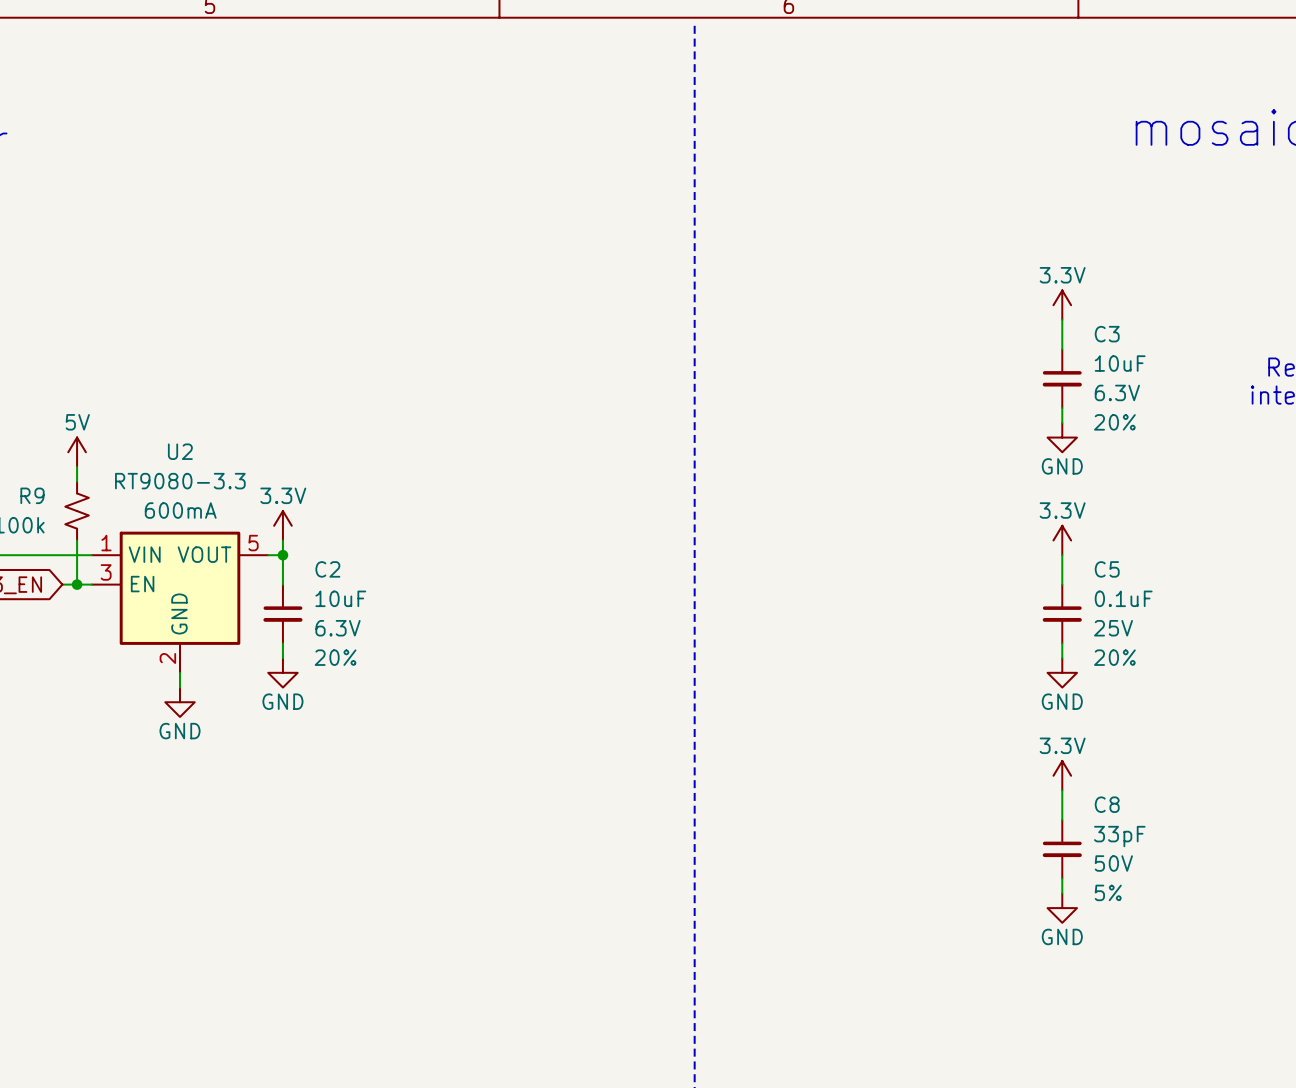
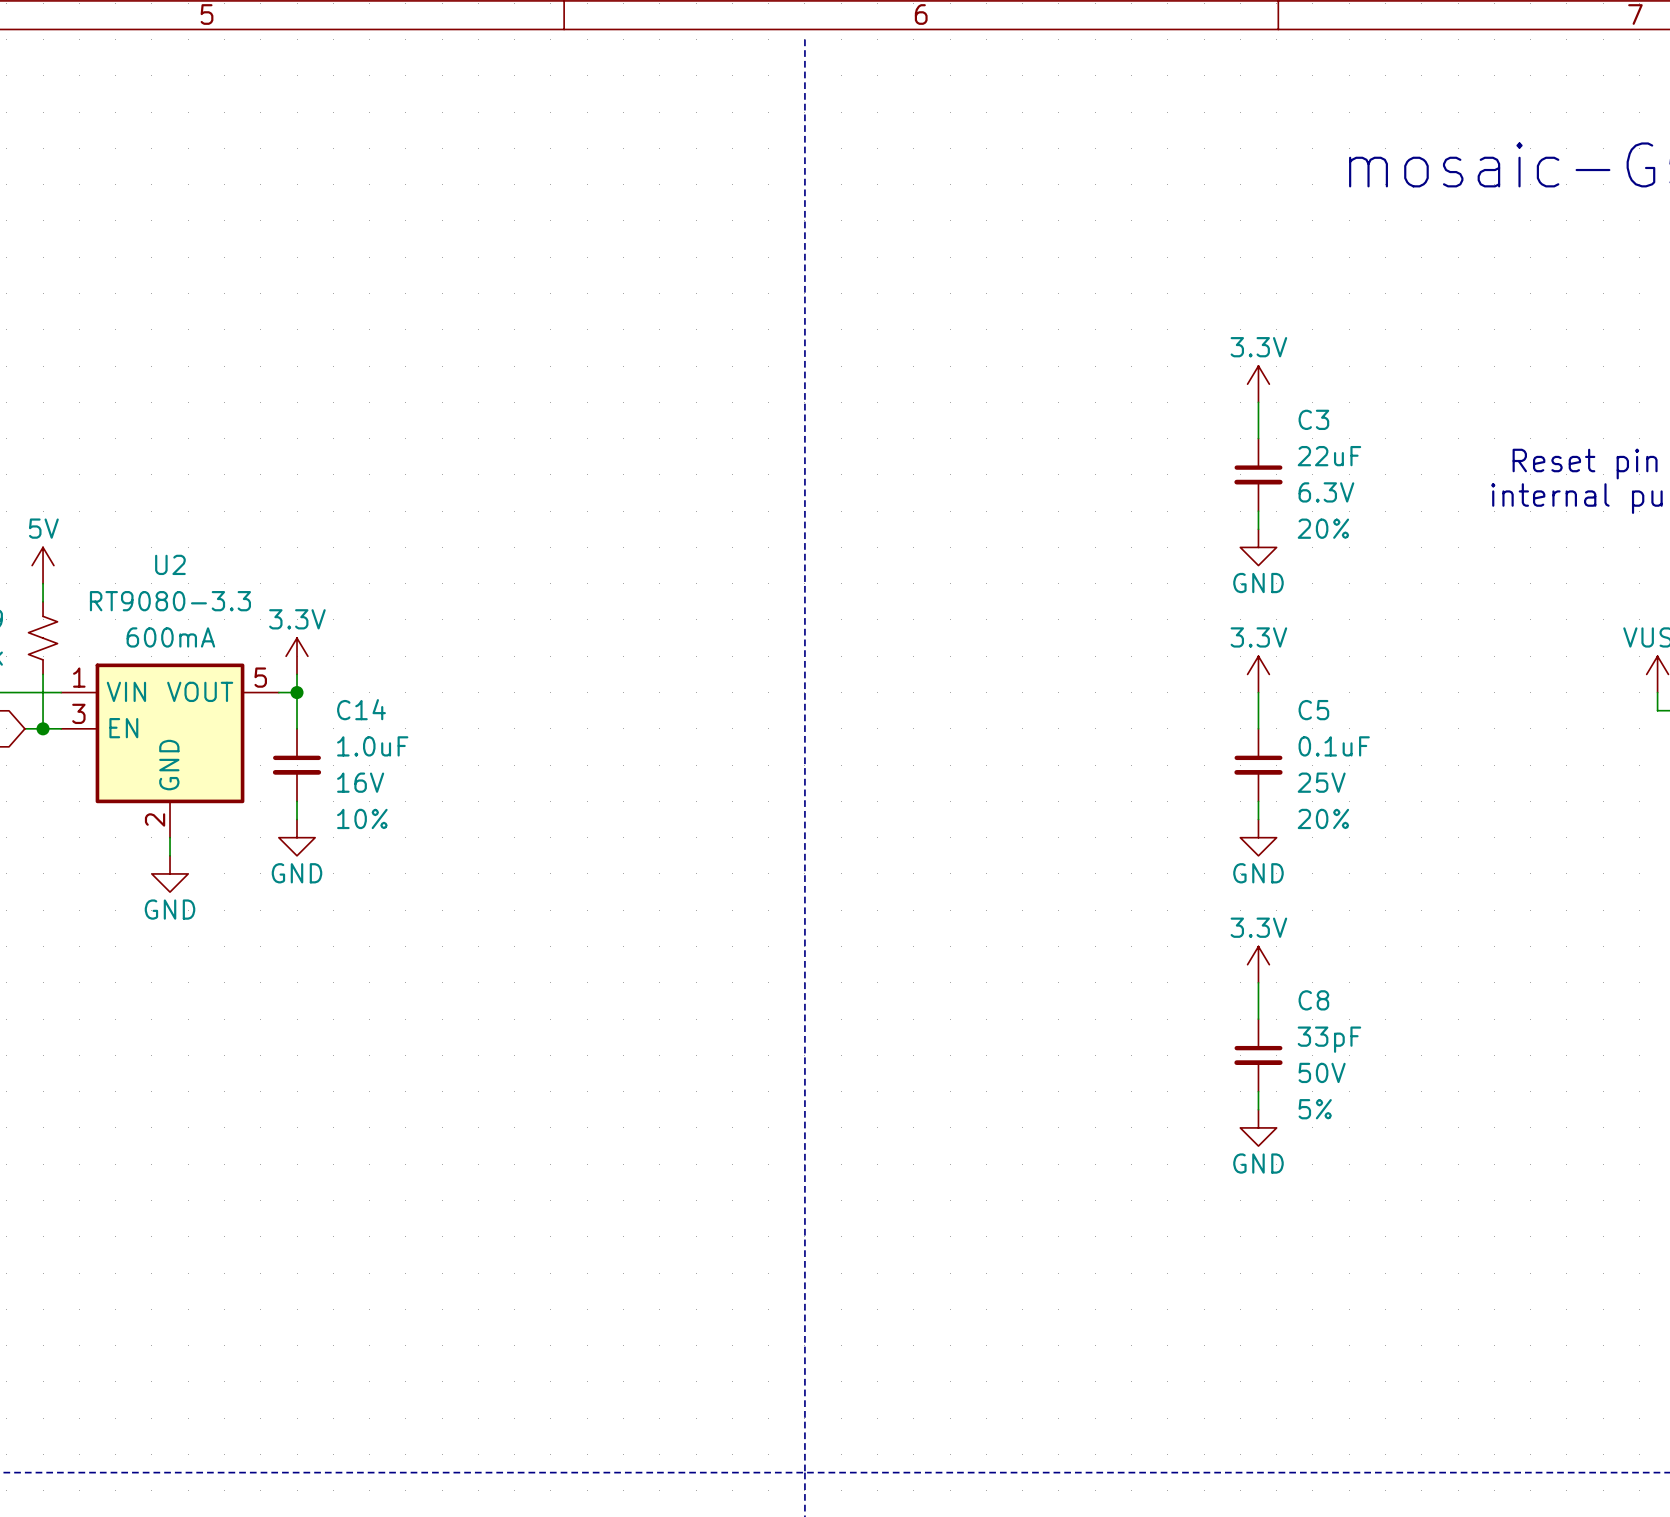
C3 value: 10uF (1120, 363) -> 22uF (1329, 456)
C2 name: C2 (327, 569) -> C14 (361, 709)
C2 value: 10uF (340, 598) -> 1.0uF (372, 746)
C2 text: 6.3V (338, 628) -> 16V (360, 782)
C2 text: 20% (335, 657) -> 10% (362, 818)

